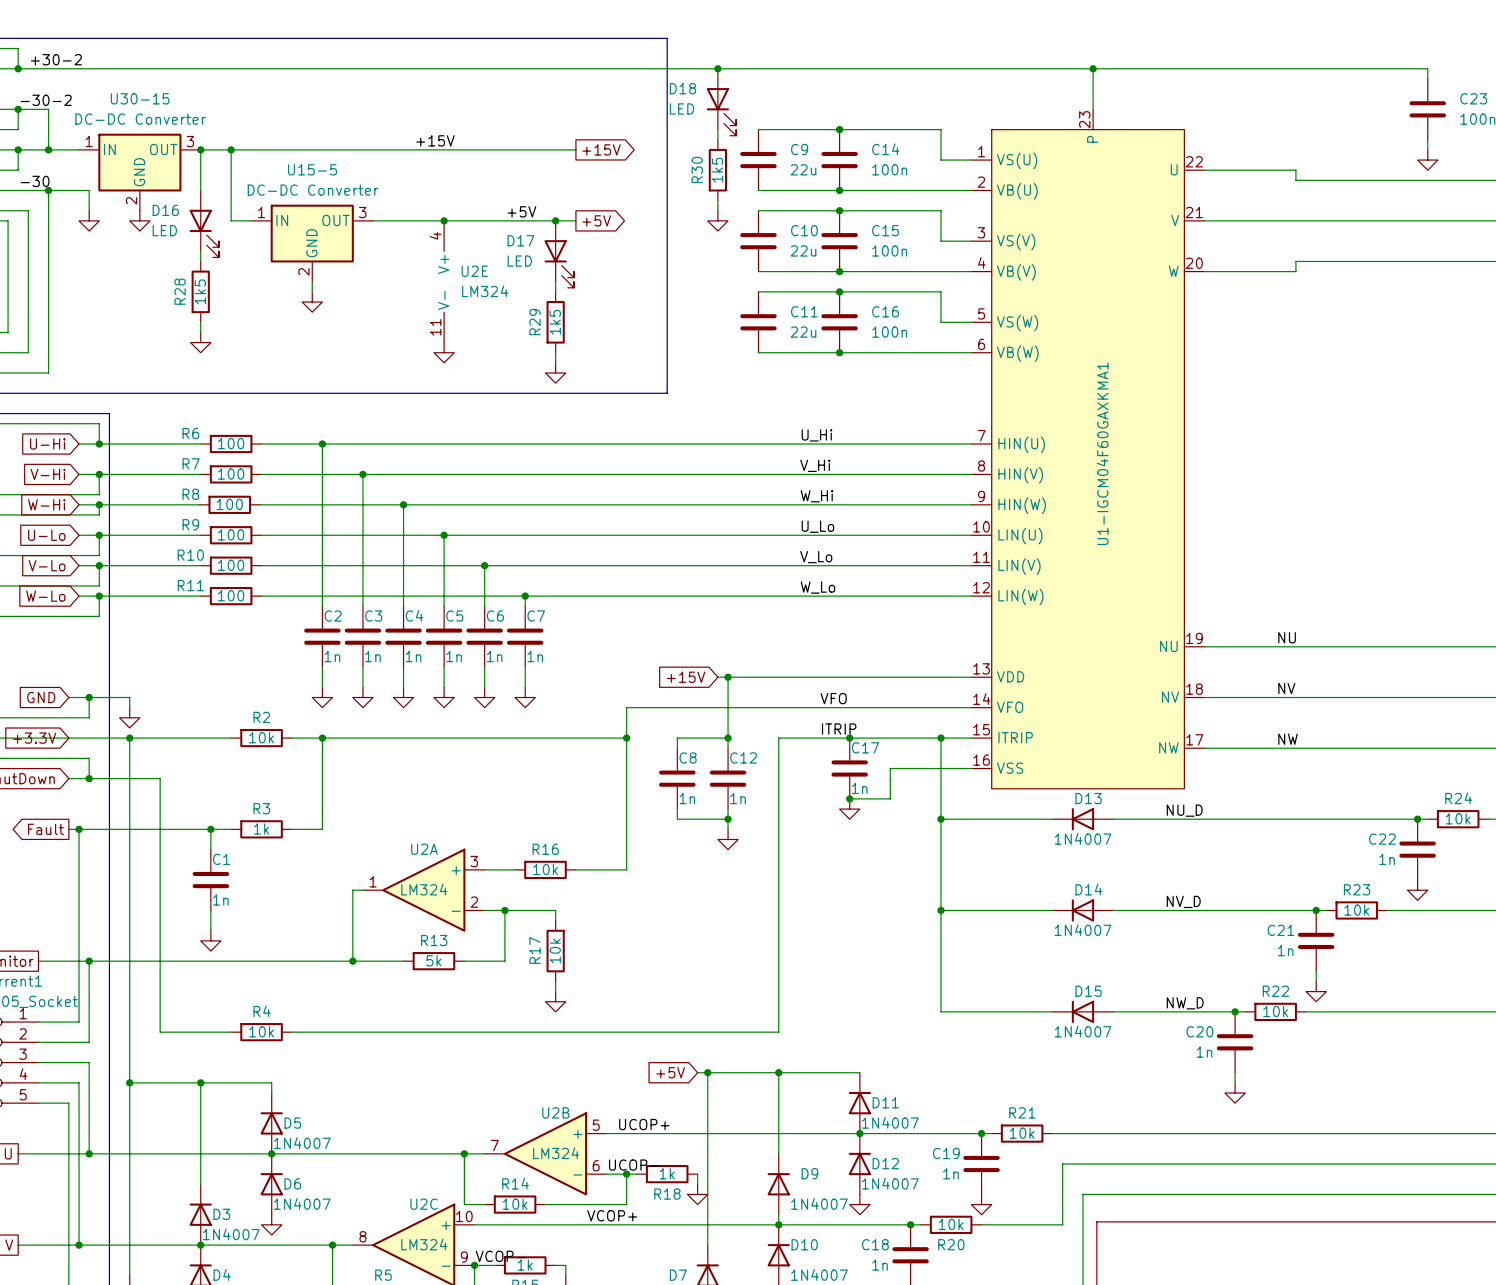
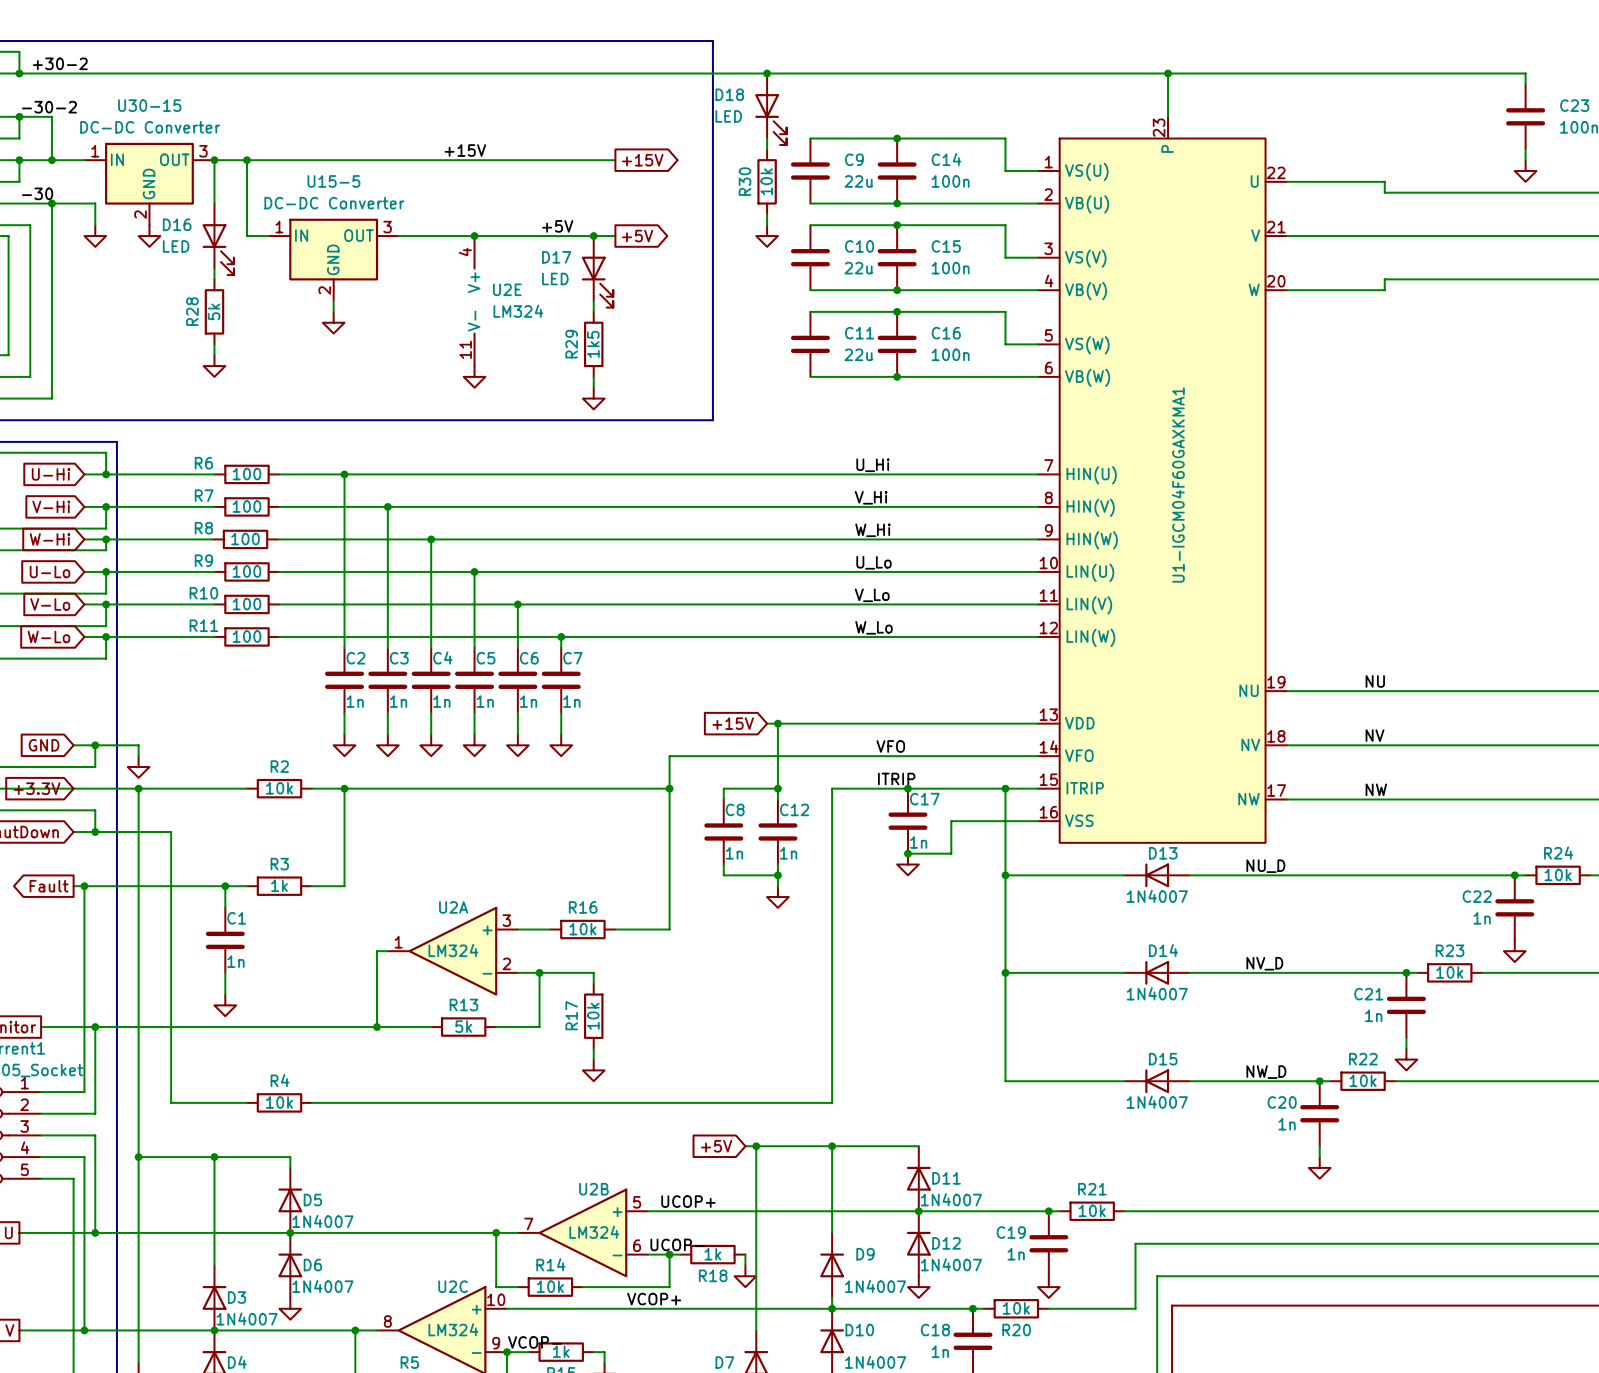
R30 value: 1k5 (717, 170) -> 10k (766, 181)
R28 value: 1k5 (200, 291) -> 5k (214, 311)

